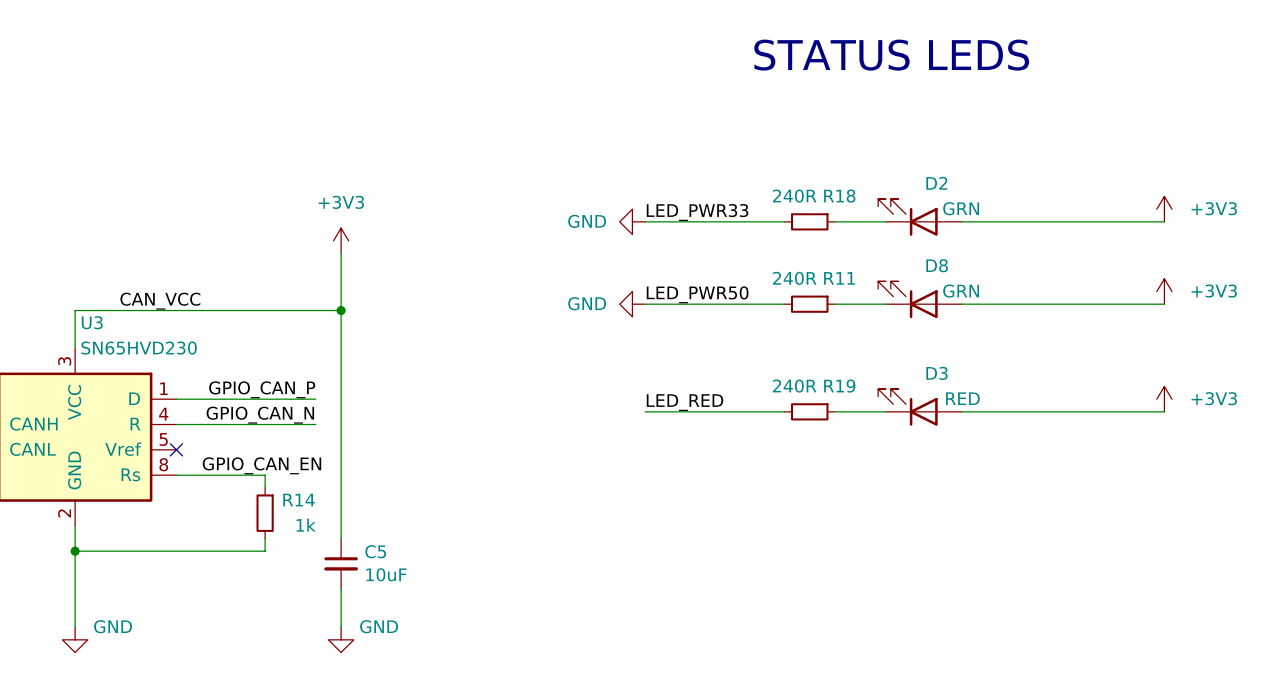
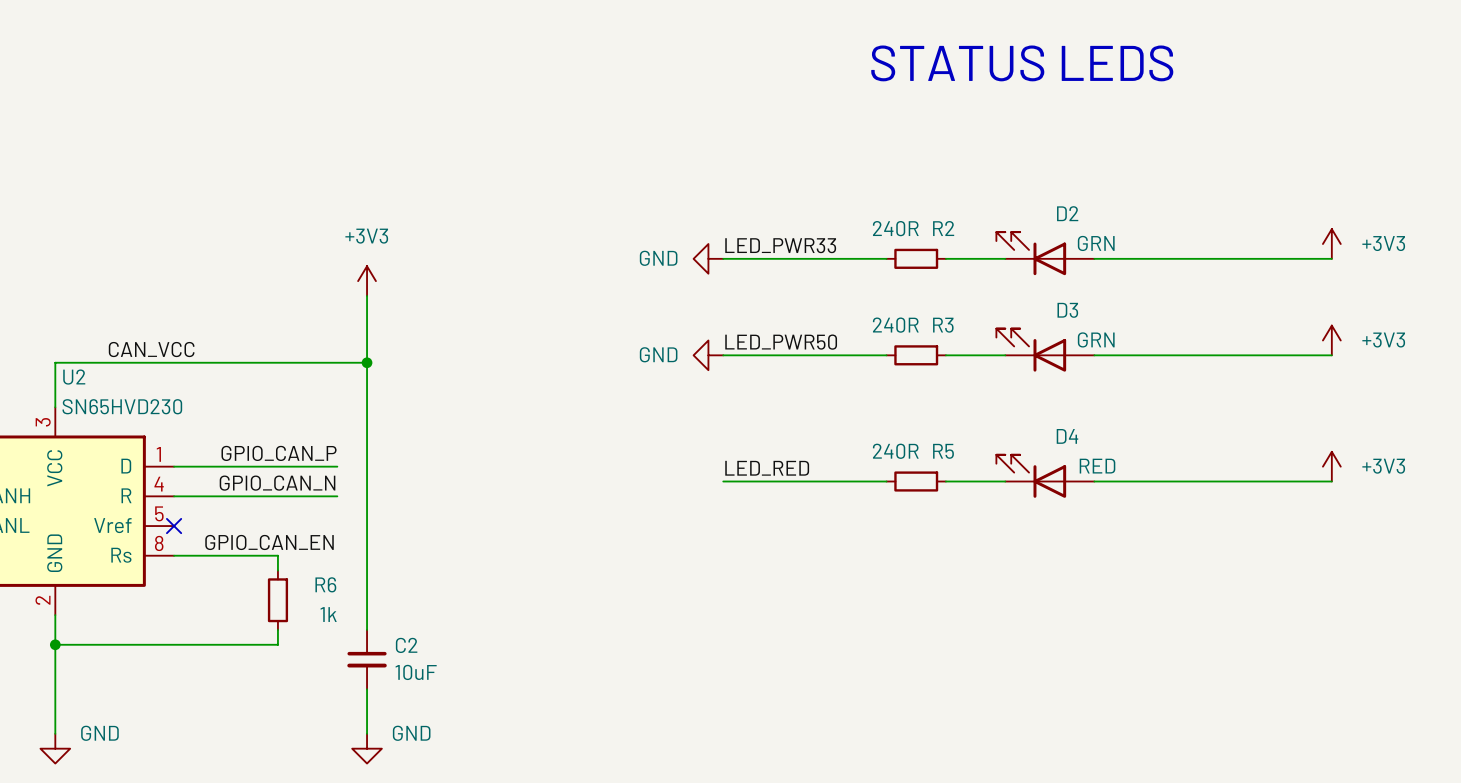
R18 name: R18 (839, 196) -> R2 (943, 228)
D8 name: D8 (937, 265) -> D3 (1067, 310)
R11 name: R11 (839, 278) -> R3 (943, 325)
U3 name: U3 (92, 322) -> U2 (74, 377)
D3 name: D3 (937, 373) -> D4 (1067, 436)
R19 name: R19 (839, 386) -> R5 (943, 451)
R14 name: R14 (299, 500) -> R6 (325, 584)
C5 name: C5 (375, 551) -> C2 (406, 645)

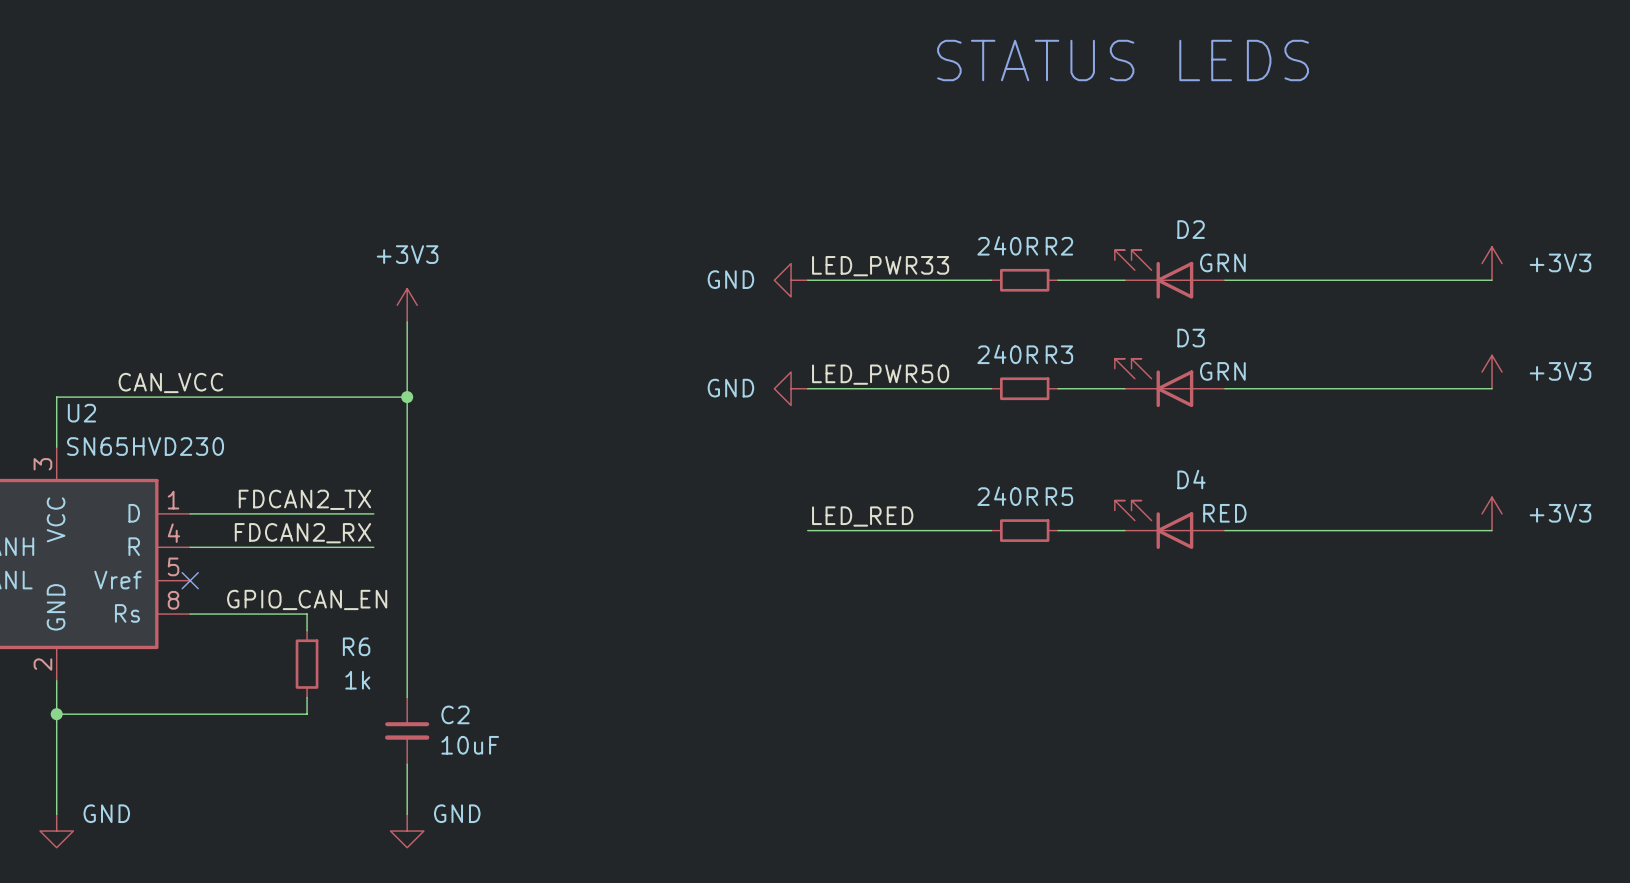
label: GPIO_CAN_P (279, 453) -> FDCAN2_TX (304, 499)
label: GPIO_CAN_N (277, 483) -> FDCAN2_RX (302, 533)

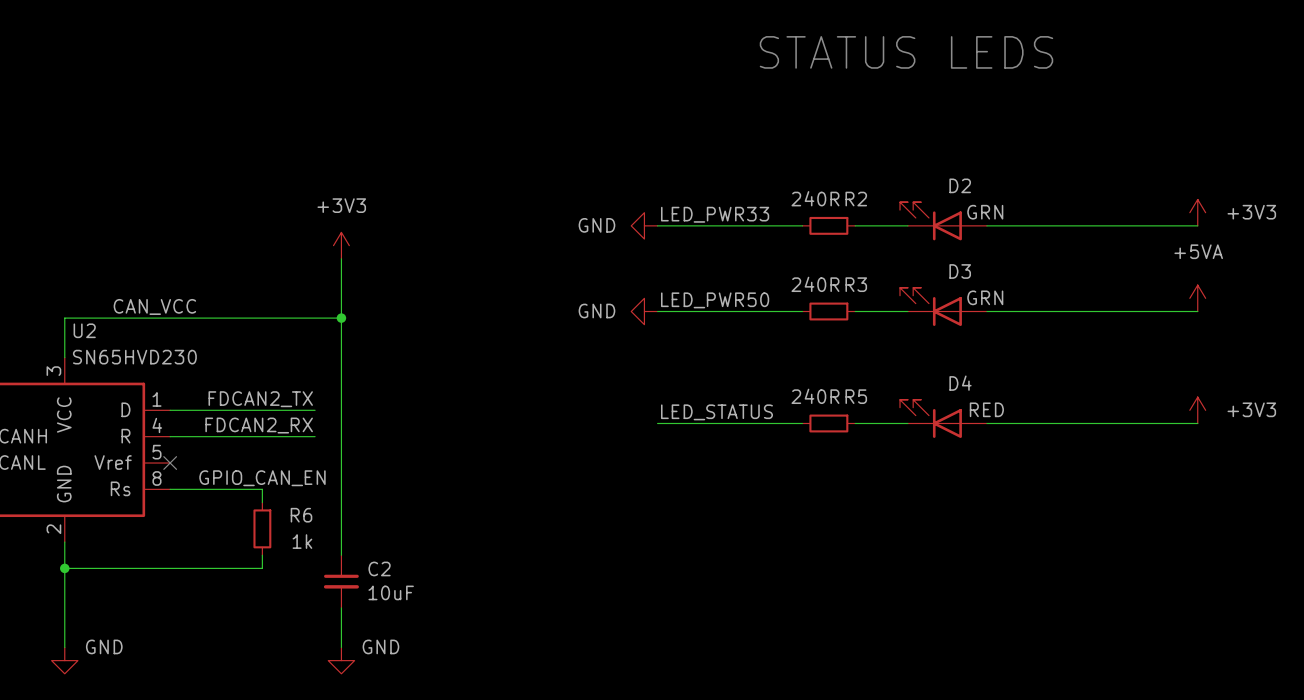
power symbol: +3V3 (1492, 372) -> +5VA (1197, 298)
label: LED_RED (862, 516) -> LED_STATUS (716, 412)

